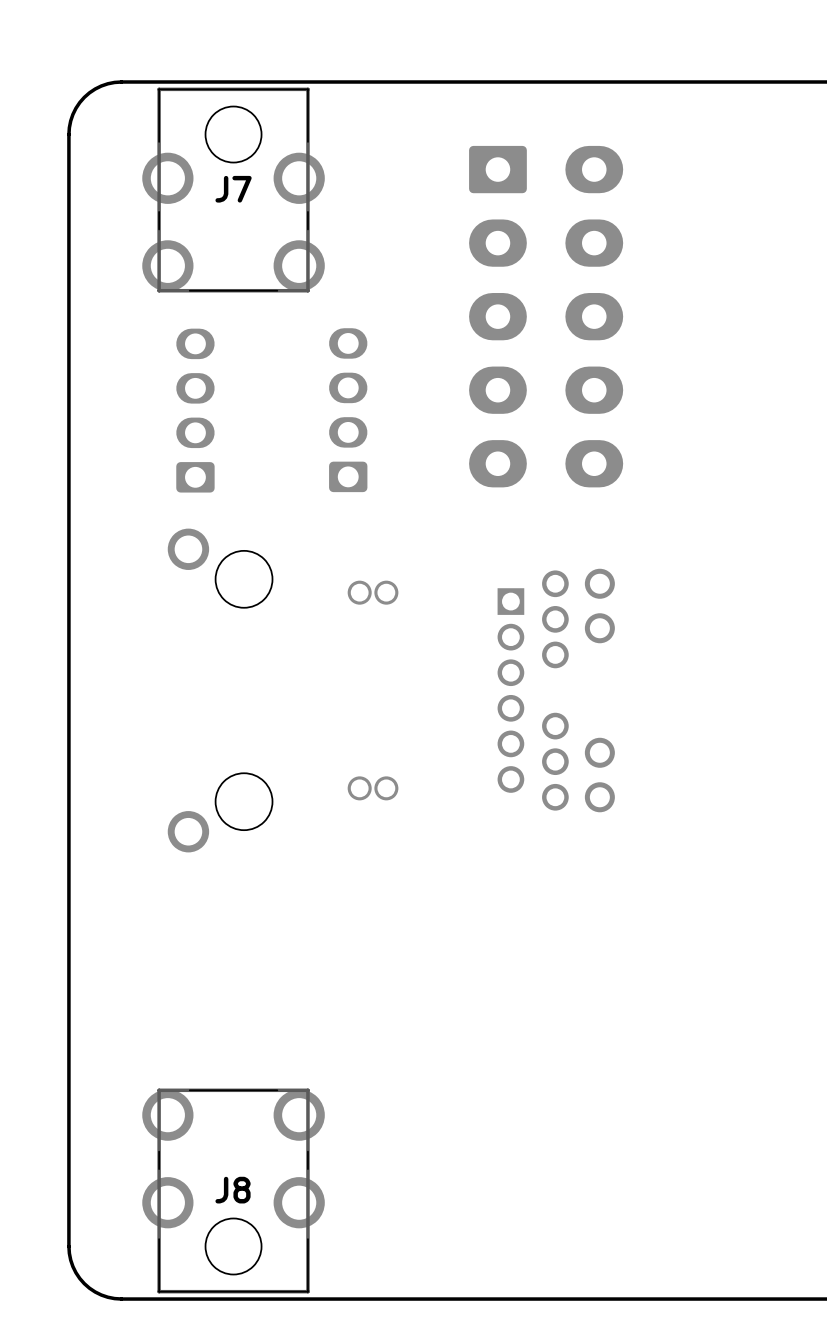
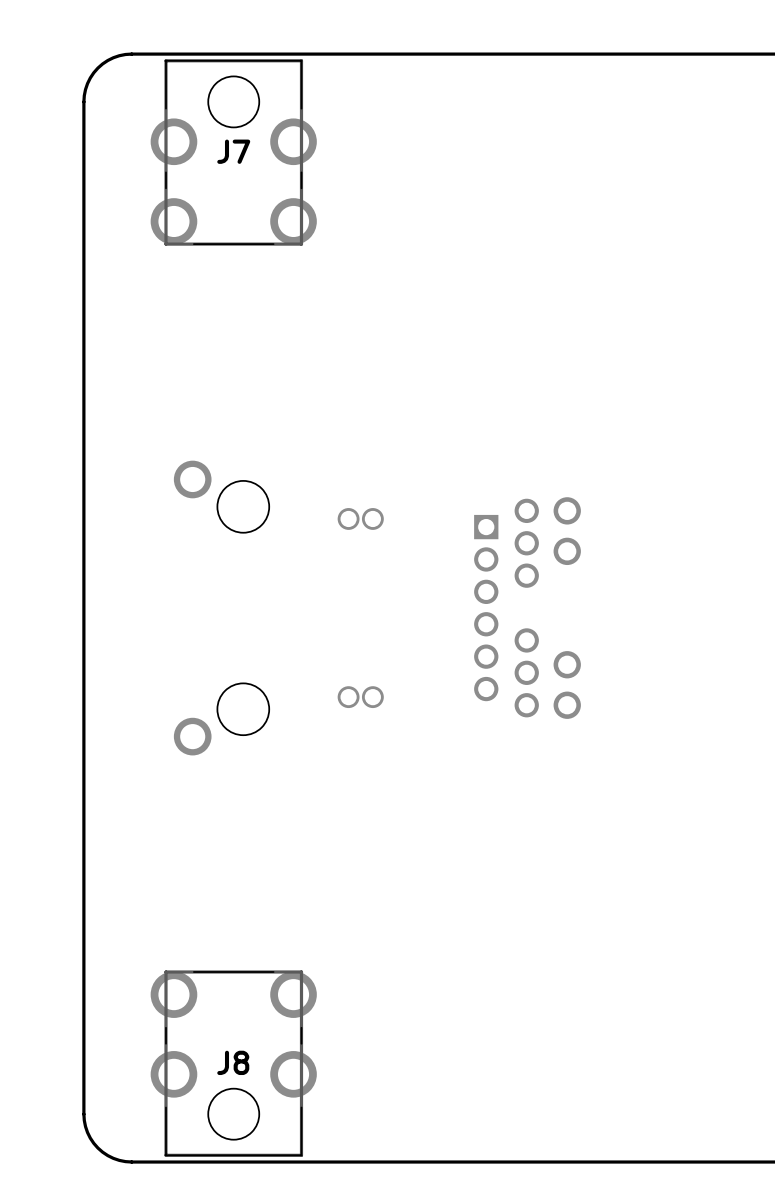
part: (546, 316) -> none
part: (195, 410) -> none
part: (348, 410) -> none

